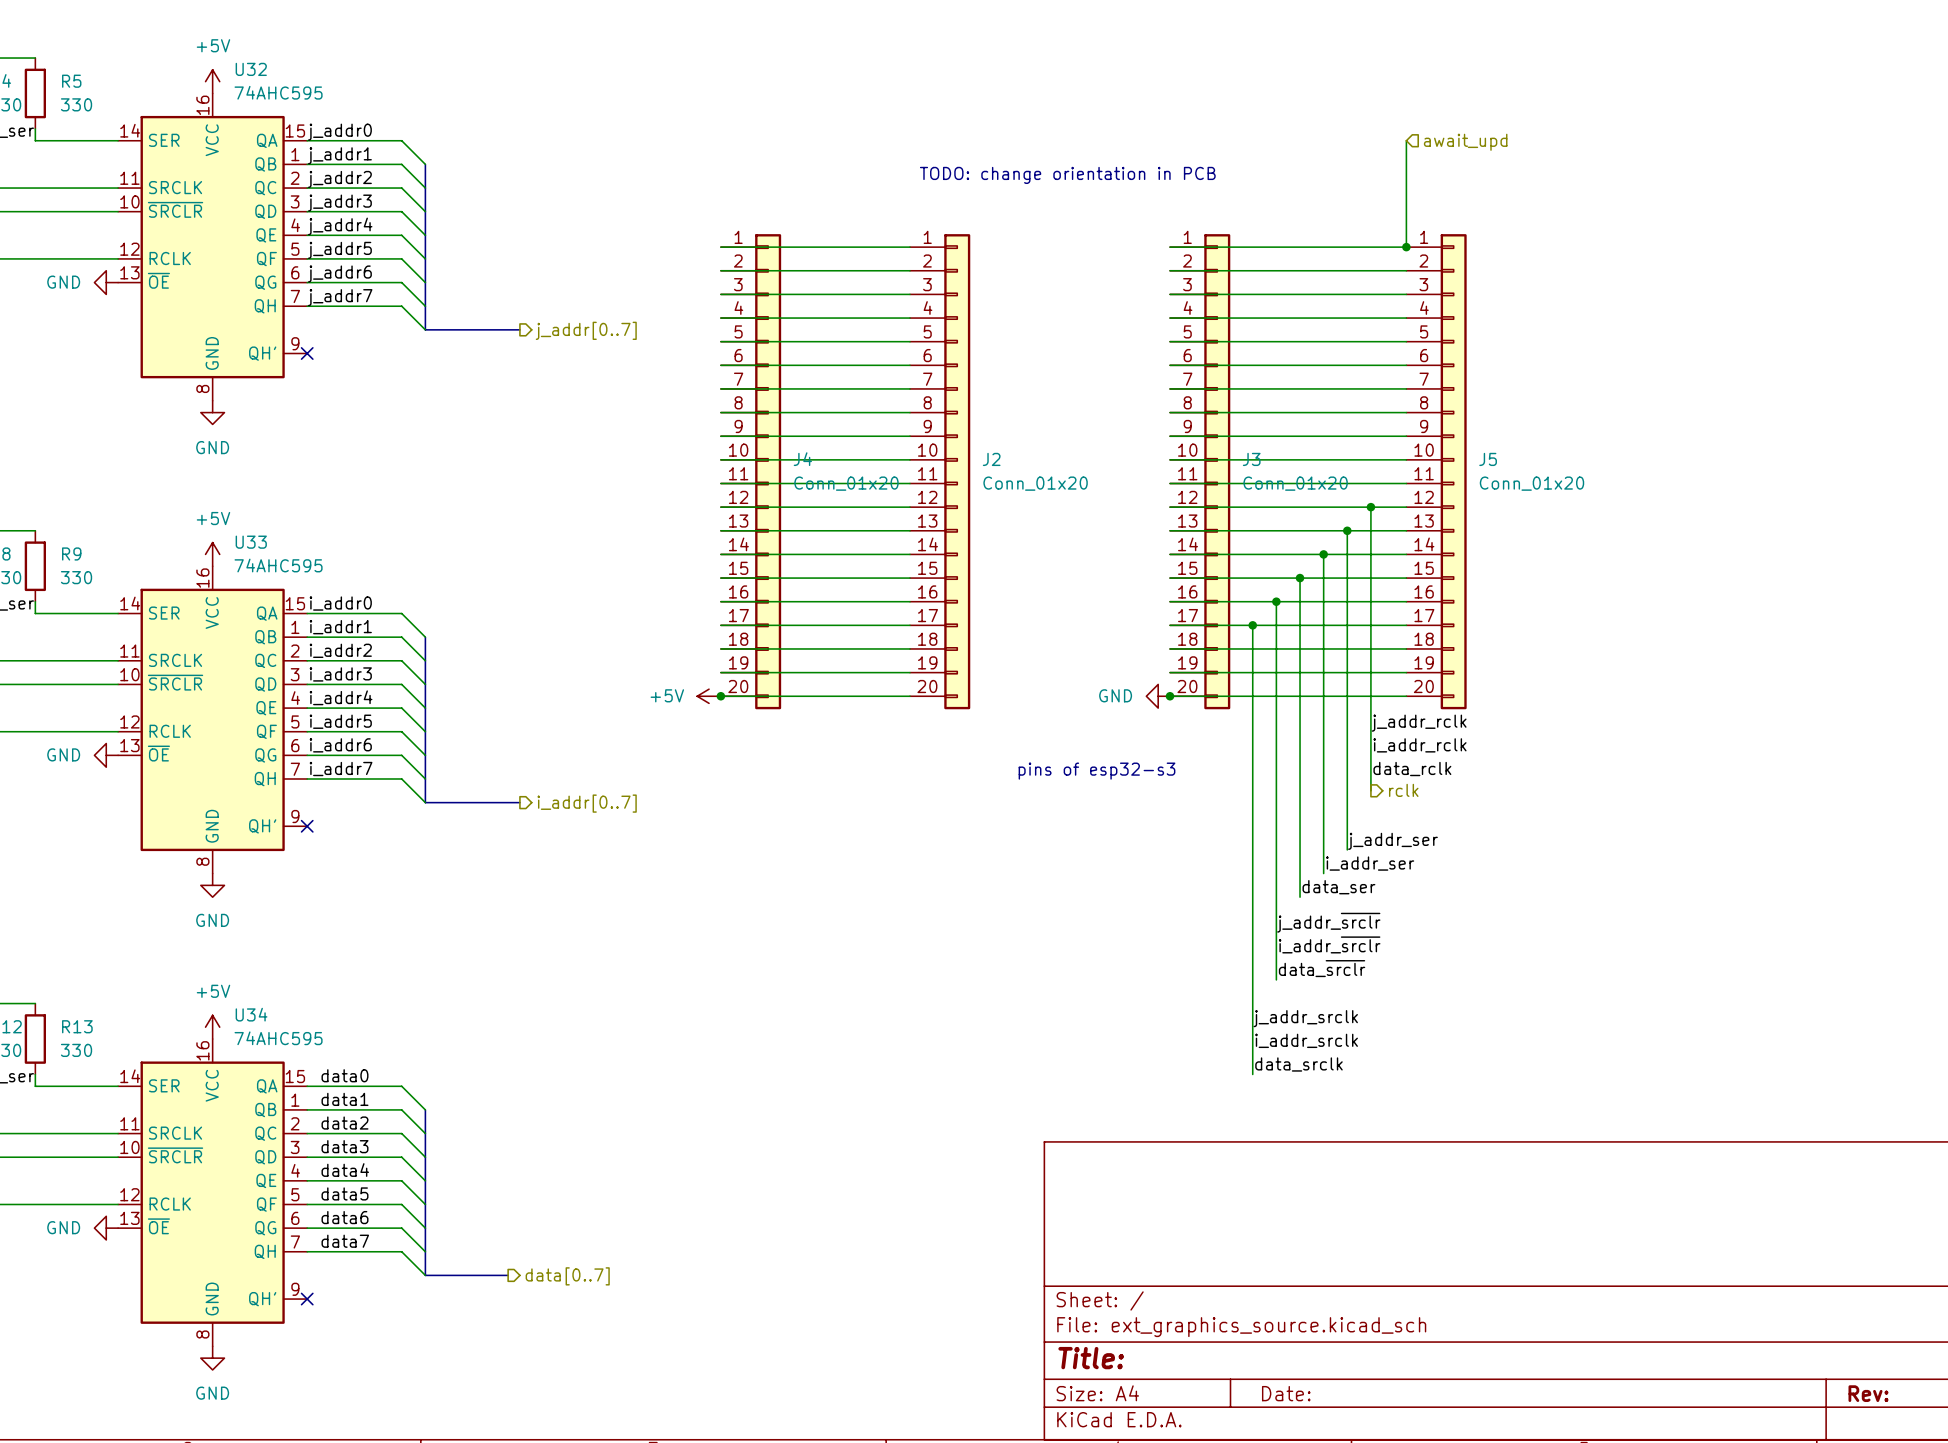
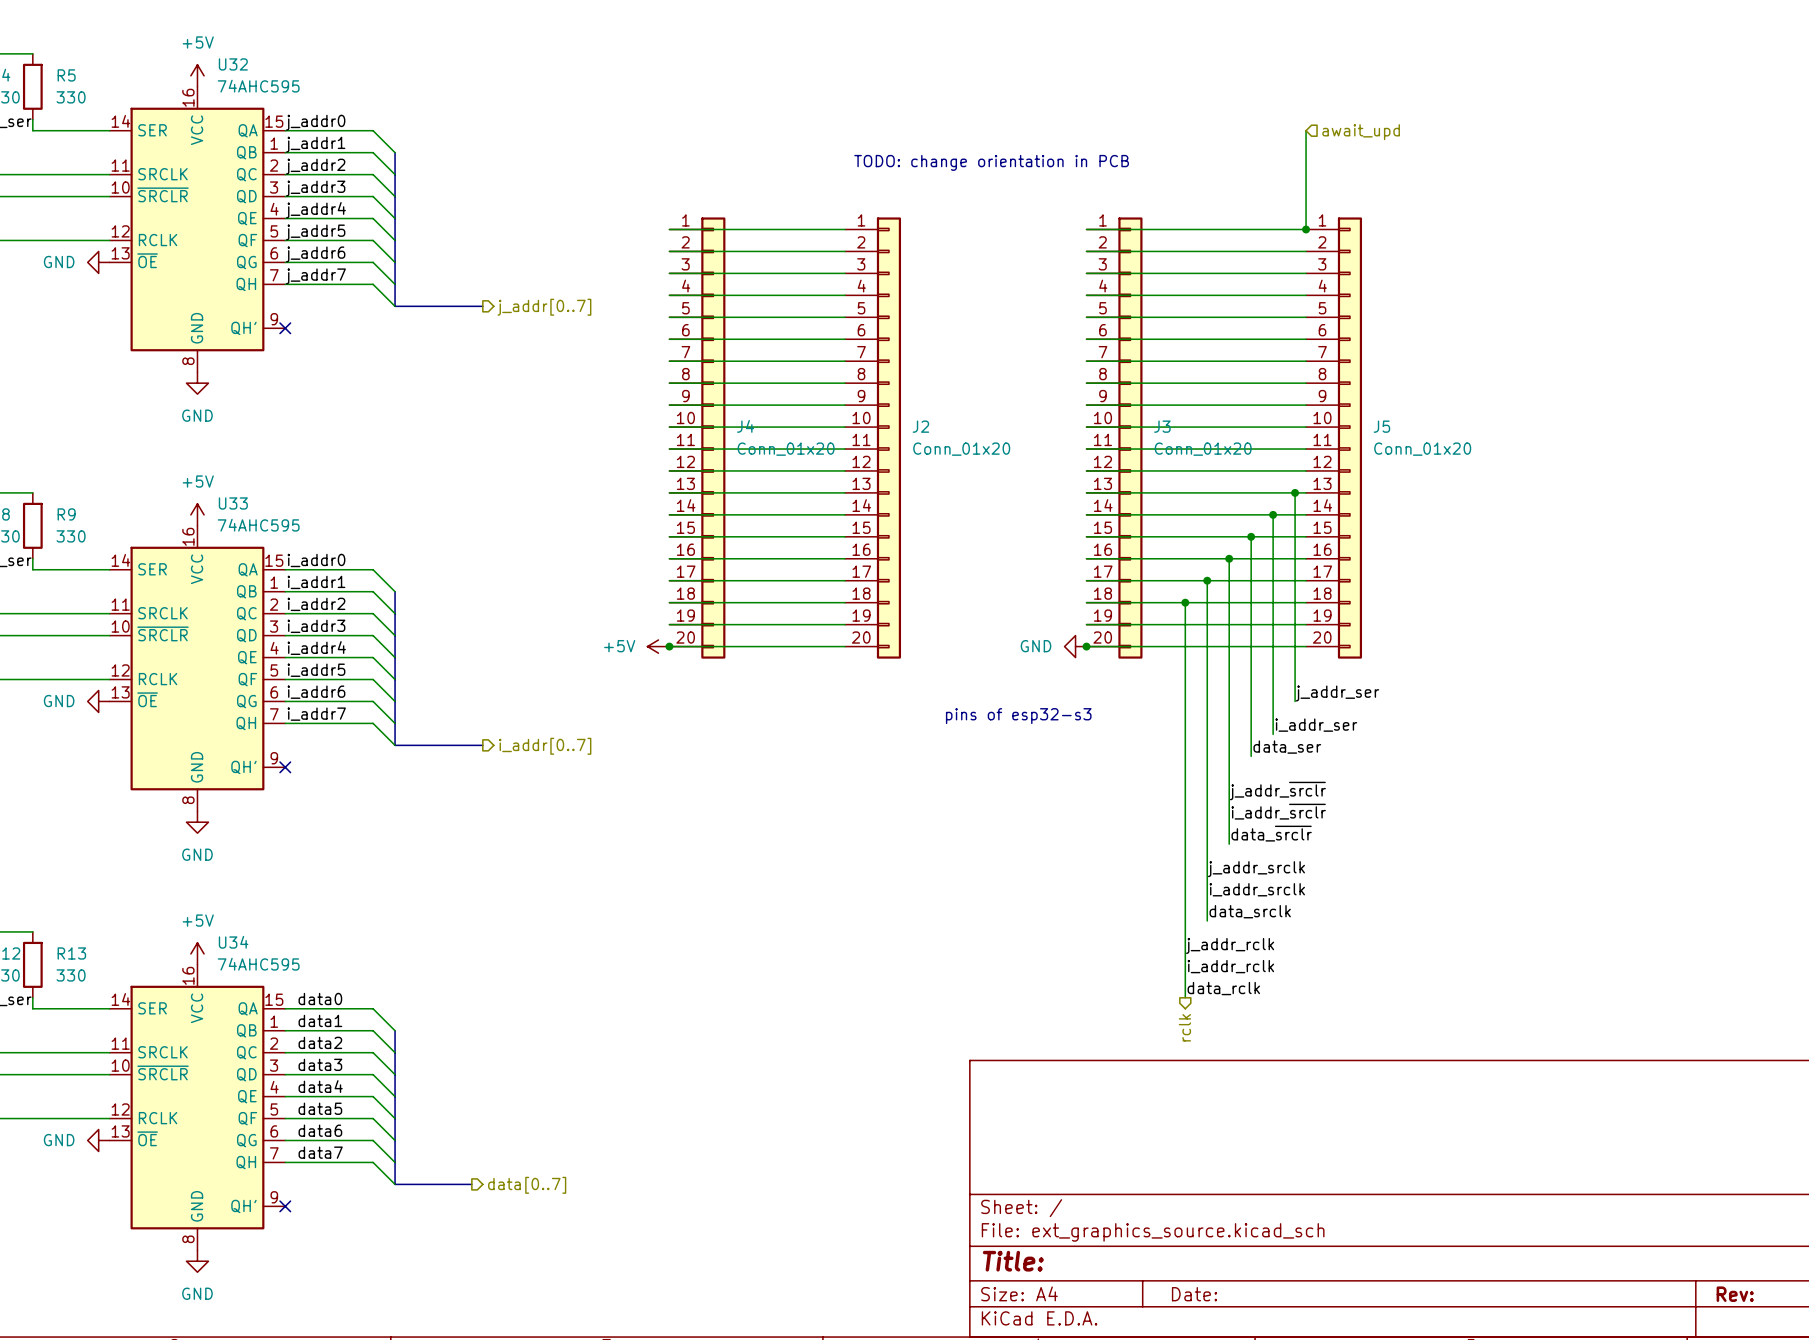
wire: (1370, 507) (1370, 554) -> none
junction: (1370, 507) -> none
wire: (1347, 530) (1347, 578) -> none
junction: (1347, 530) -> none
wire: none -> (1295, 492) (1295, 701)
junction: none -> (1295, 492)
wire: (1323, 554) (1323, 601) -> none
junction: (1323, 554) -> none
junction: none -> (1273, 514)
wire: (1300, 578) (1300, 625) -> none
junction: (1300, 578) -> none
junction: none -> (1251, 536)
wire: (1276, 601) (1276, 648) -> none
junction: (1276, 601) -> none
junction: none -> (1229, 558)
wire: (1252, 625) (1252, 1074) -> none
junction: (1252, 625) -> none
junction: none -> (1207, 580)
junction: none -> (1185, 602)
label: j_addr_rclk (1419, 723) -> none
label: i_addr_rclk (1419, 745) -> none
label: data_rclk (1412, 769) -> none
hierarchical label: rclk (1403, 790) -> none
wire: (1347, 814) (1347, 849) -> (1229, 811) (1229, 844)
label position: j_addr_ser (1392, 841) -> j_addr_ser (1337, 693)
label position: i_addr_ser (1370, 863) -> i_addr_ser (1316, 725)
label position: data_ser (1338, 887) -> data_ser (1287, 747)
wire: none -> (1207, 833) (1207, 920)
label position: j_addr_~{srclr} (1328, 922) -> j_addr_~{srclr} (1277, 791)
label position: i_addr_~{srclr} (1329, 944) -> i_addr_~{srclr} (1278, 811)
label position: data_~{srclr} (1322, 968) -> data_~{srclr} (1271, 833)
wire: none -> (1185, 910) (1185, 997)
label position: j_addr_srclk (1305, 1018) -> j_addr_srclk (1256, 869)
label: none -> j_addr_rclk (1230, 945)
label position: i_addr_srclk (1306, 1040) -> i_addr_srclk (1257, 889)
label: none -> i_addr_rclk (1230, 966)
label position: data_srclk (1298, 1064) -> data_srclk (1250, 911)
label: none -> data_rclk (1223, 988)
hierarchical label: none -> rclk (1184, 1027)

